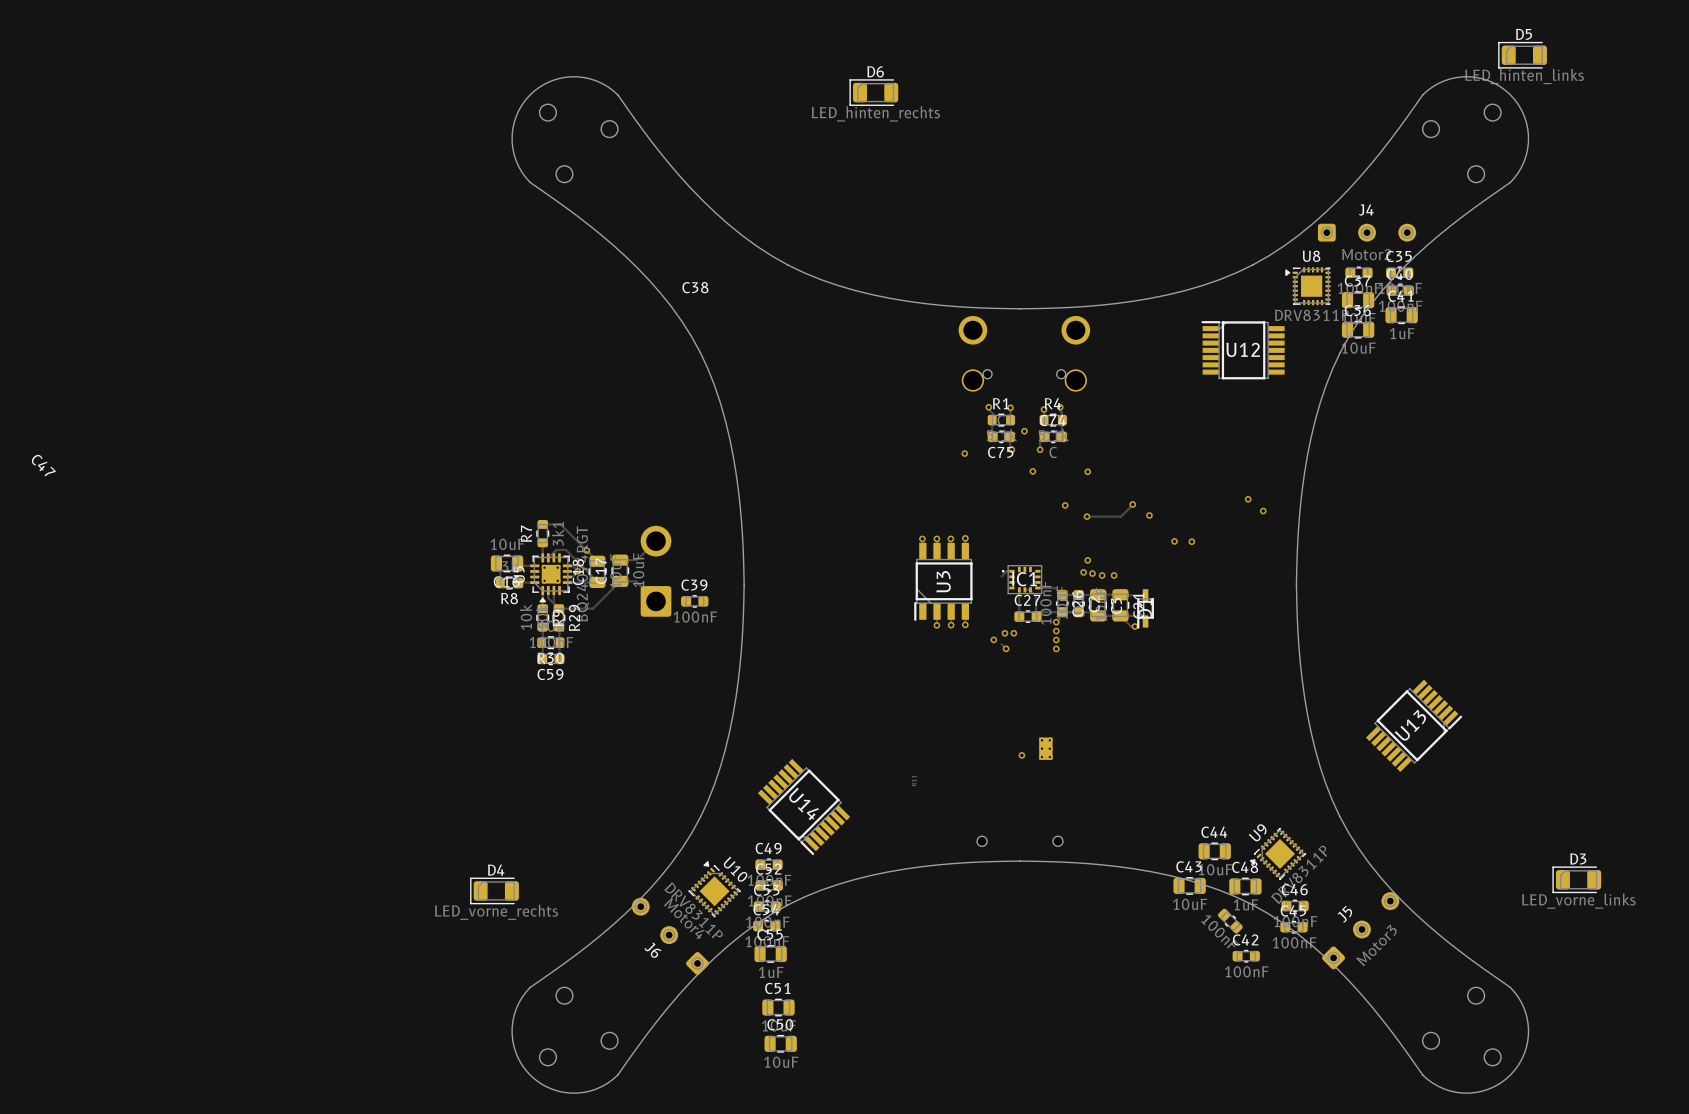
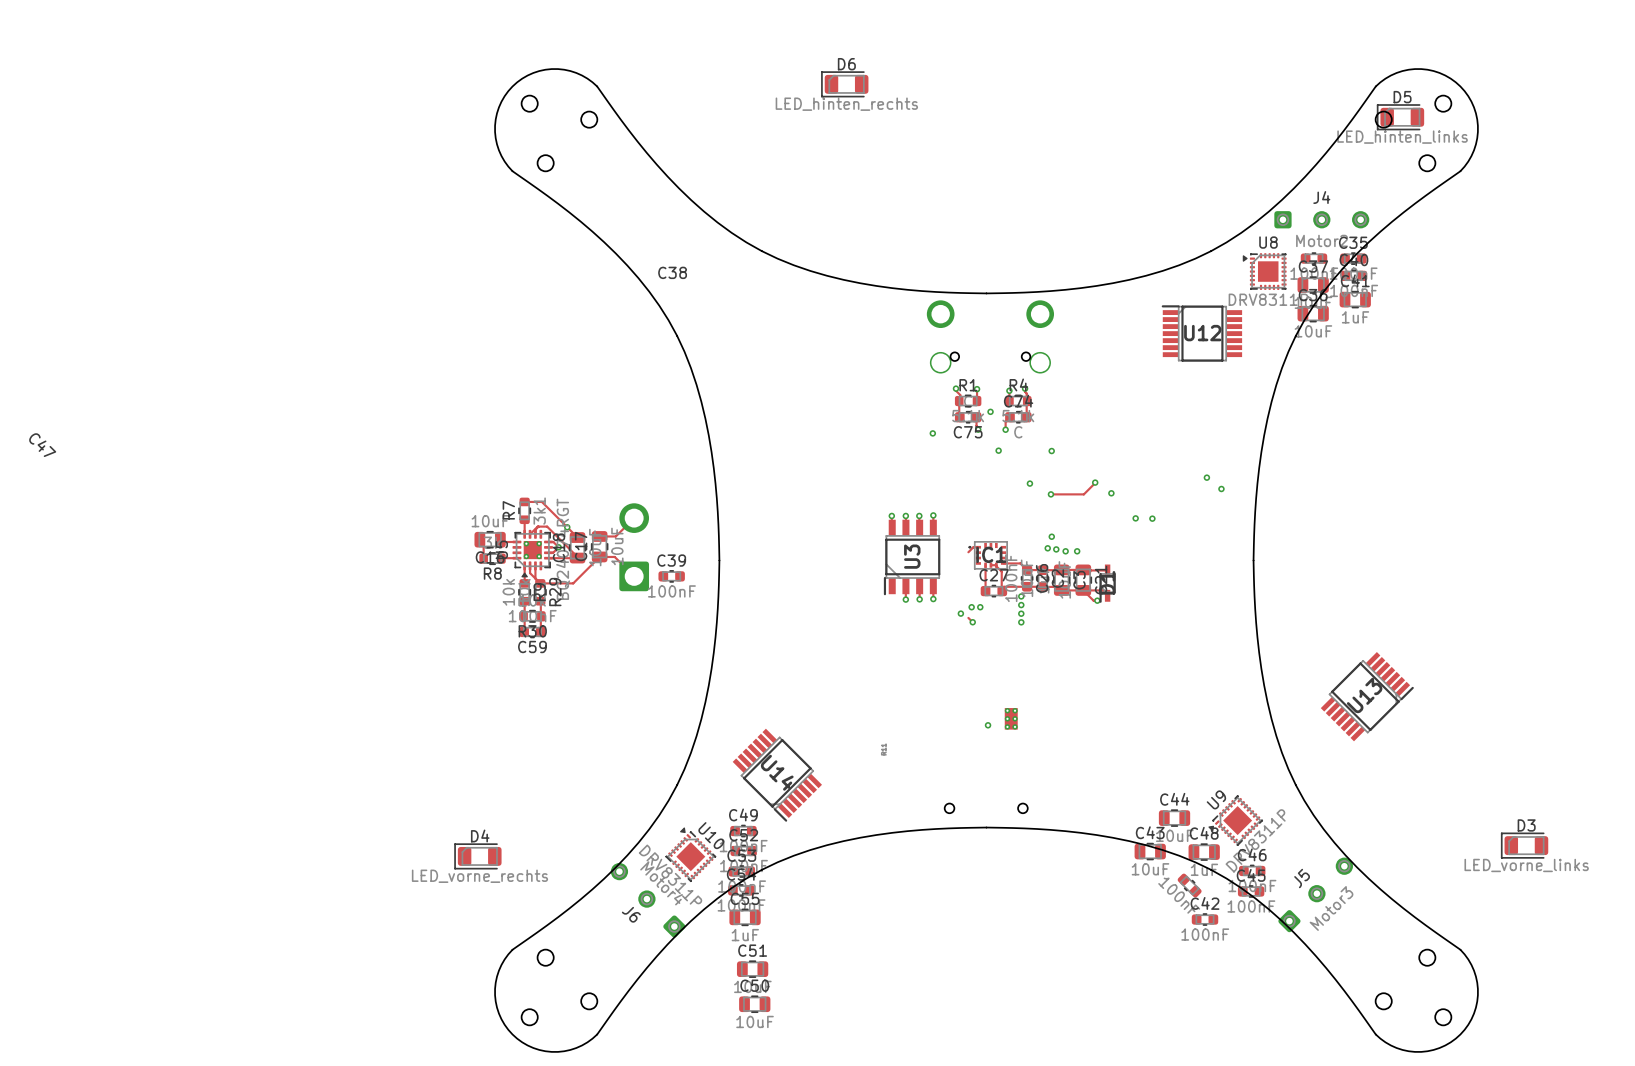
D5 position: (1522, 55) -> (1400, 117)

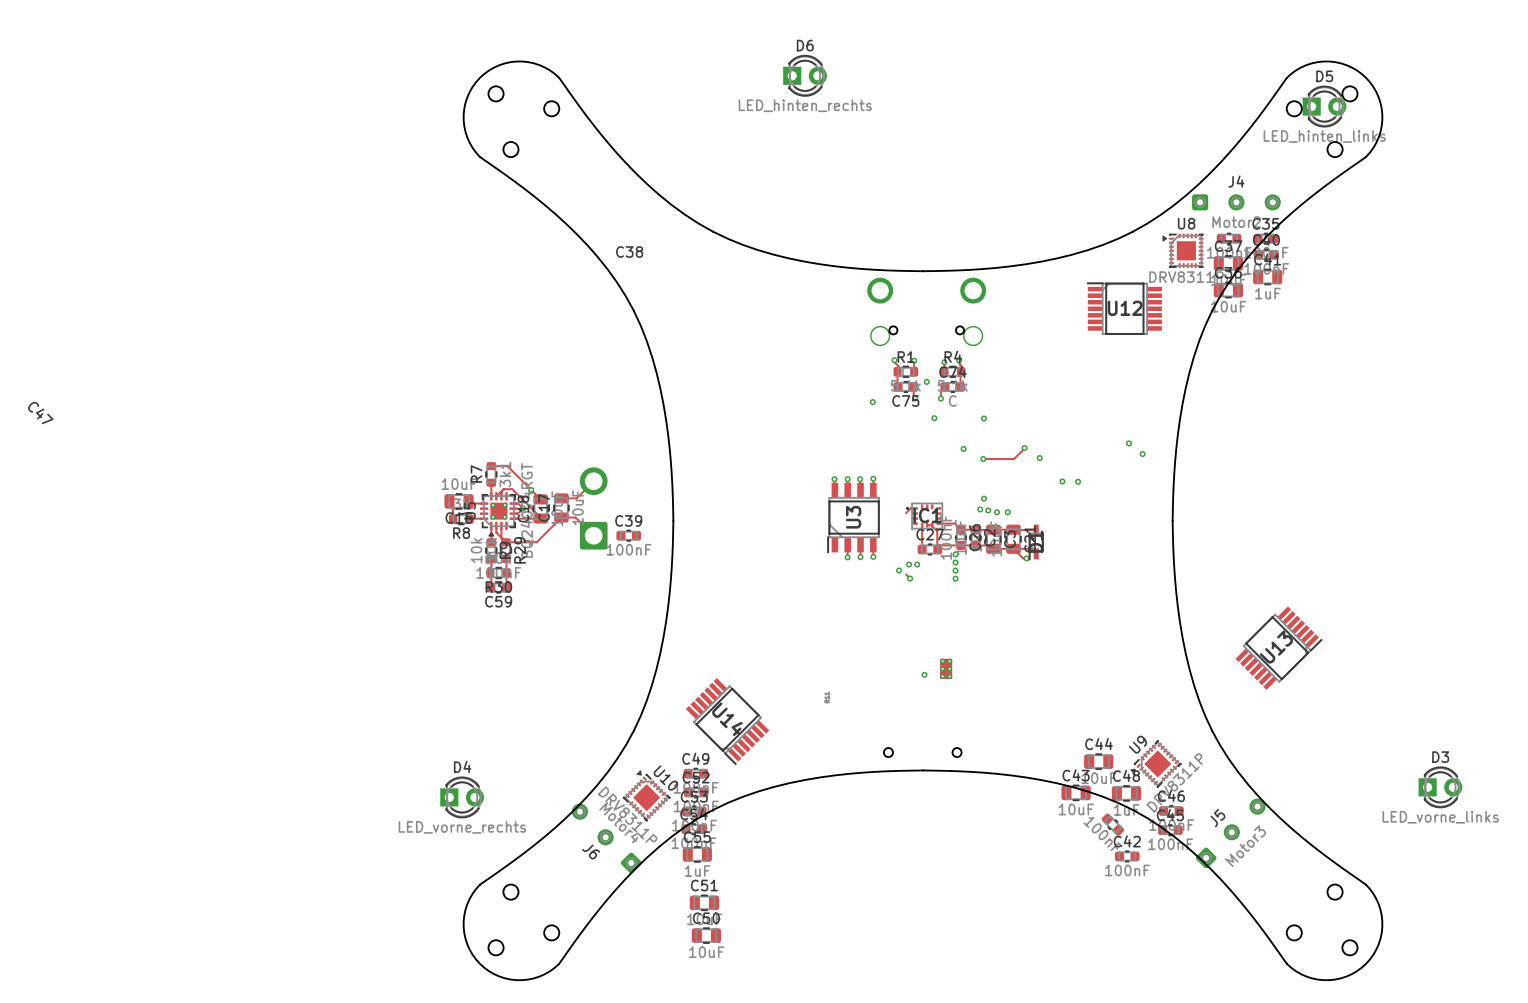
D6 footprint: [821, 71, 869, 98] -> [783, 55, 827, 97]
D5 footprint: [1377, 104, 1425, 131] -> [1302, 85, 1347, 128]
D3 footprint: [1501, 832, 1549, 859] -> [1418, 766, 1463, 809]
D4 footprint: [454, 843, 502, 870] -> [440, 776, 485, 819]

